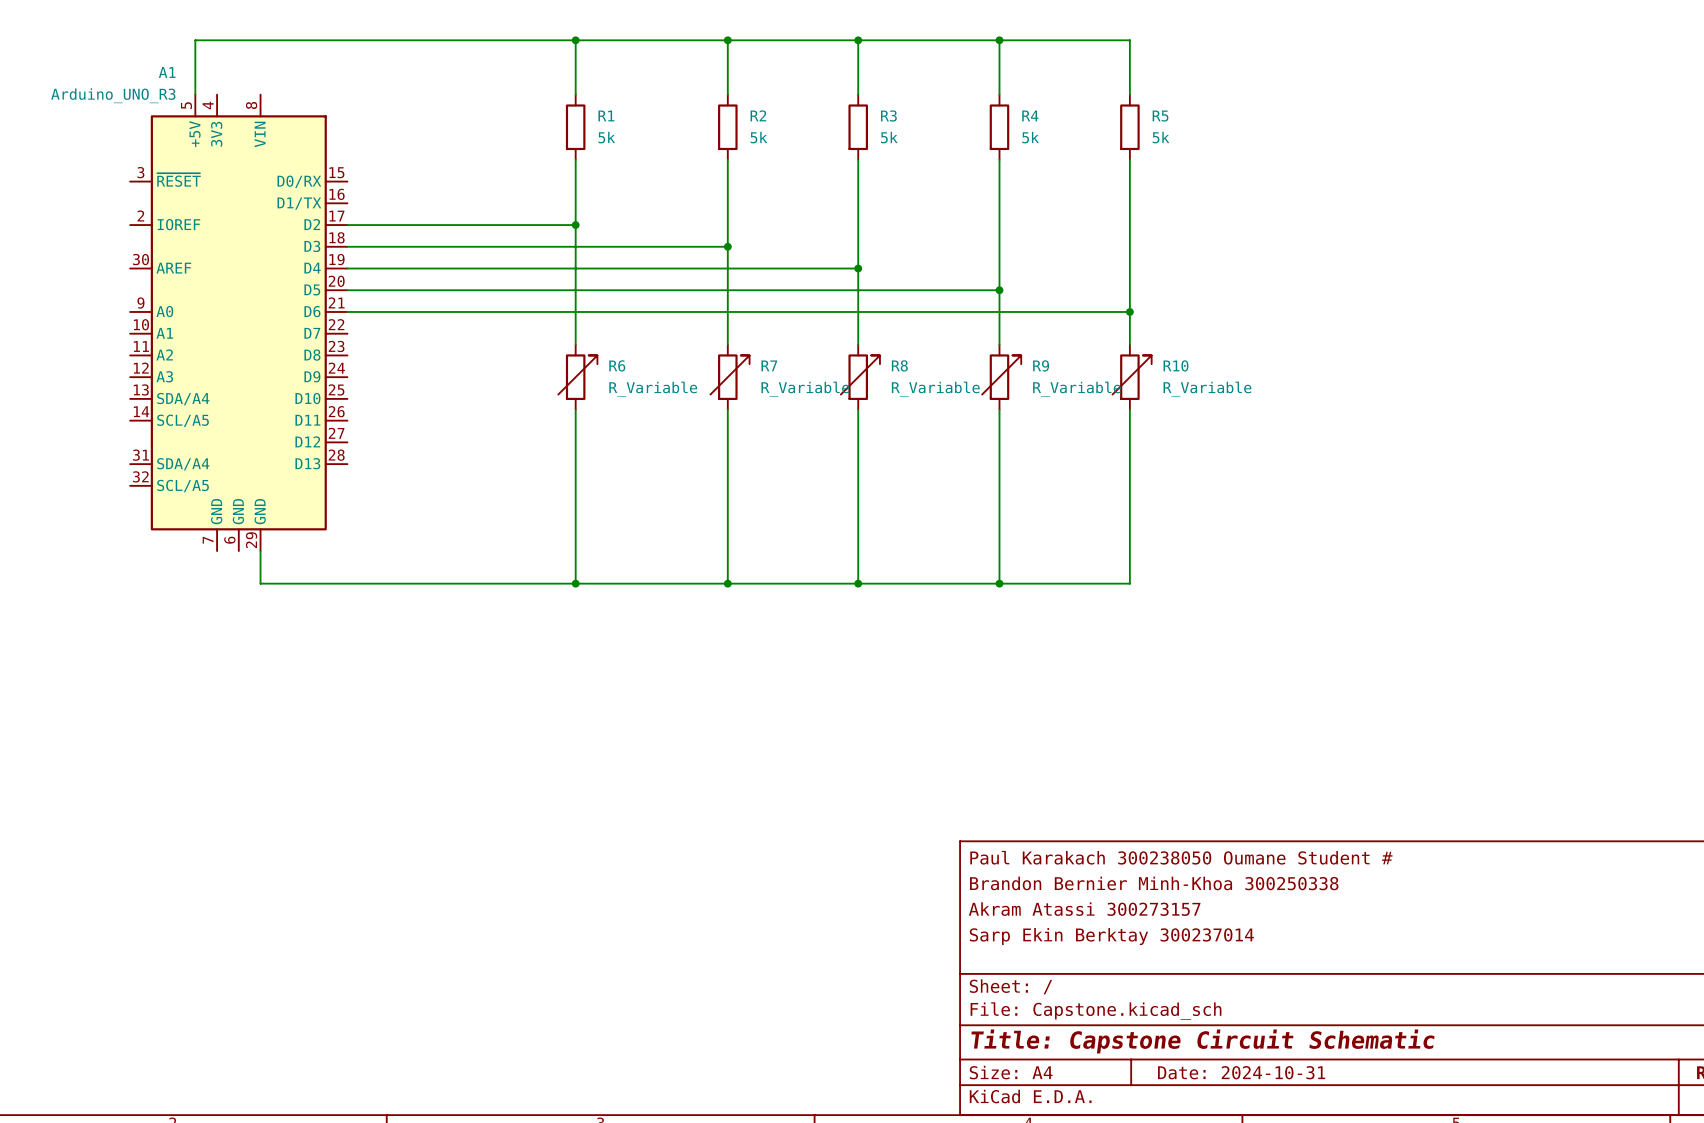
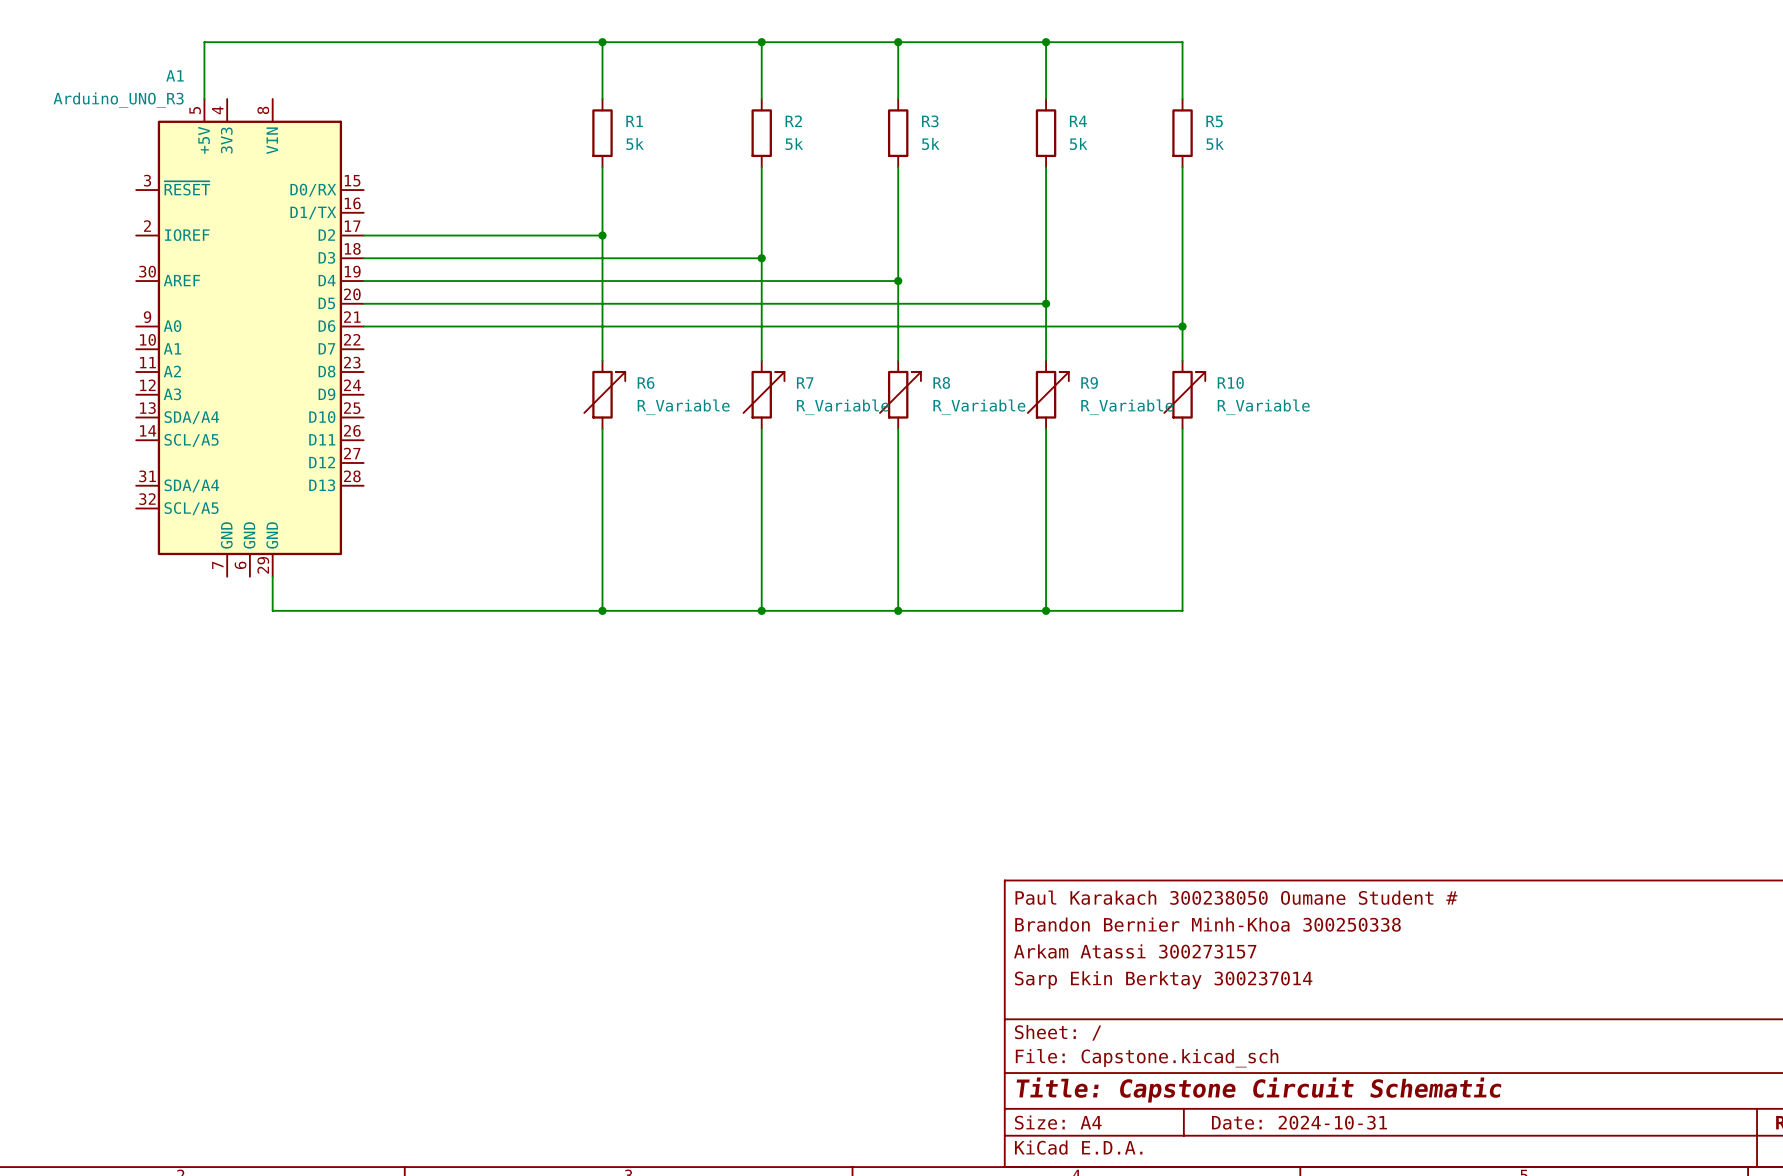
title block: Akram Atassi 300273157 (1084, 909) -> Arkam Atassi 300273157 (1135, 951)

